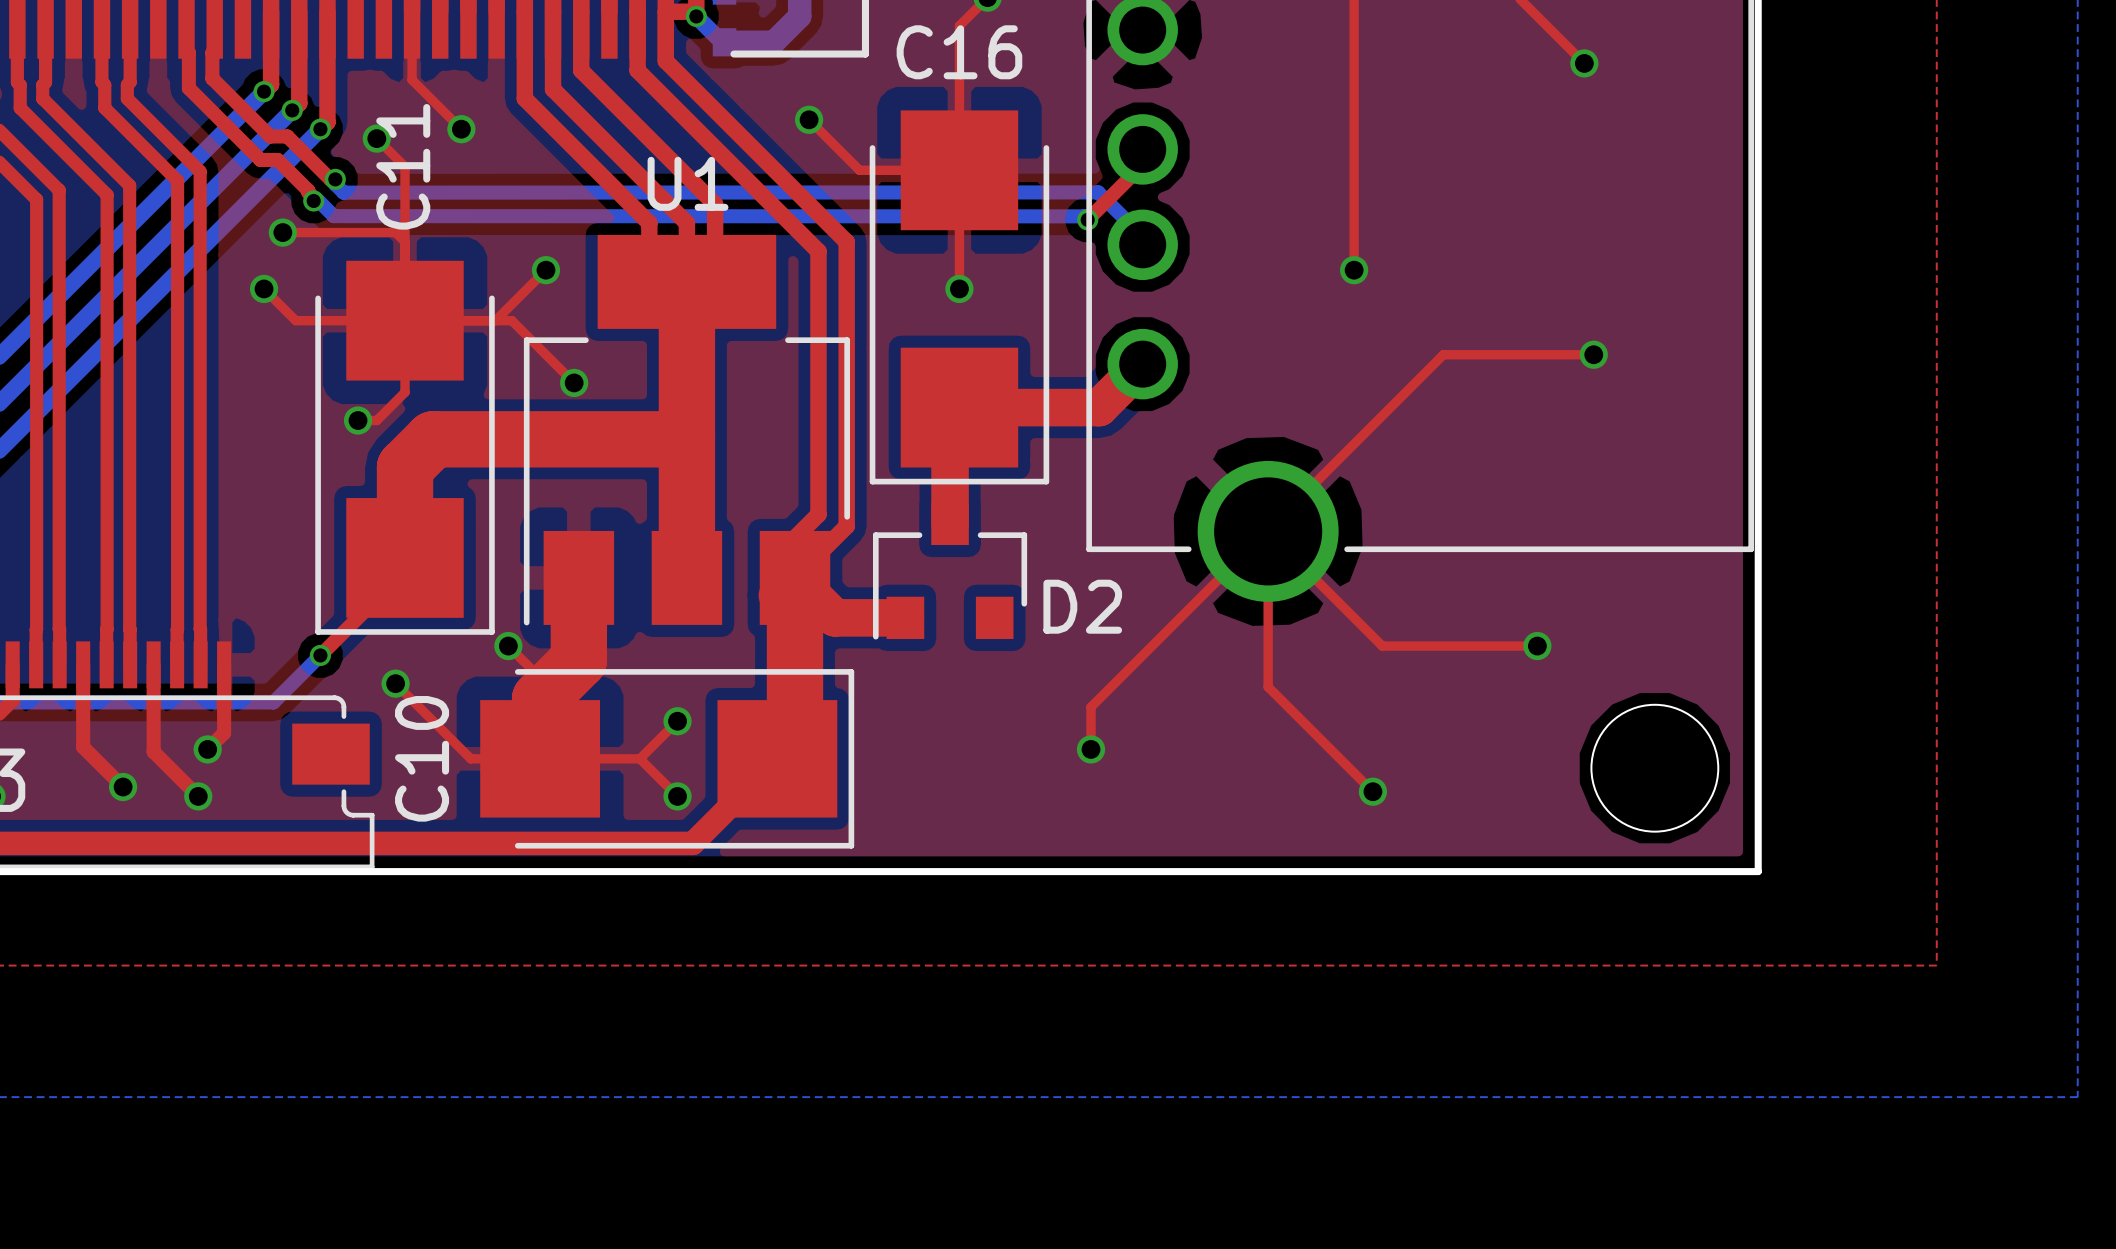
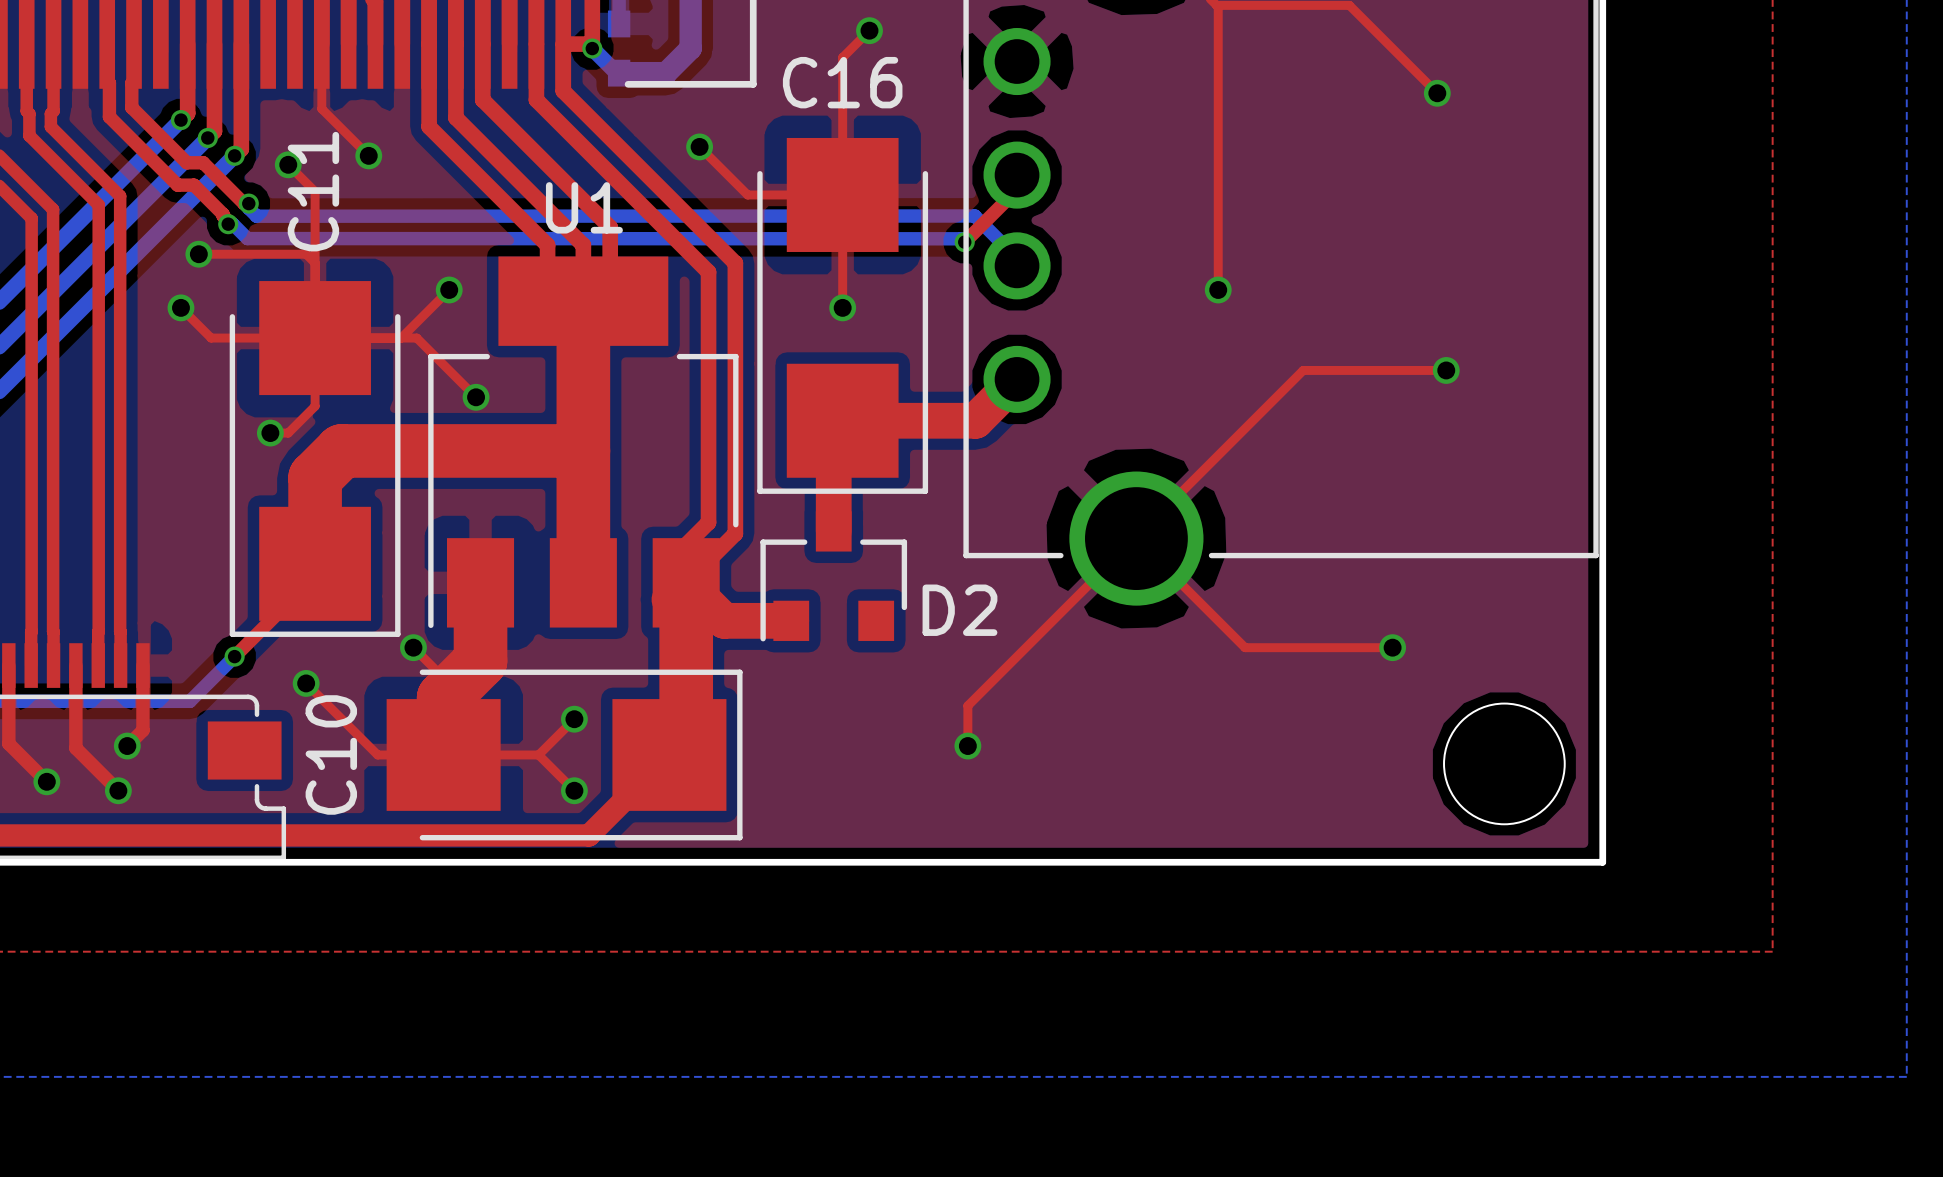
top track: (1268, 581) (1268, 686) (1372, 791) -> none
via: (1372, 791) -> none

